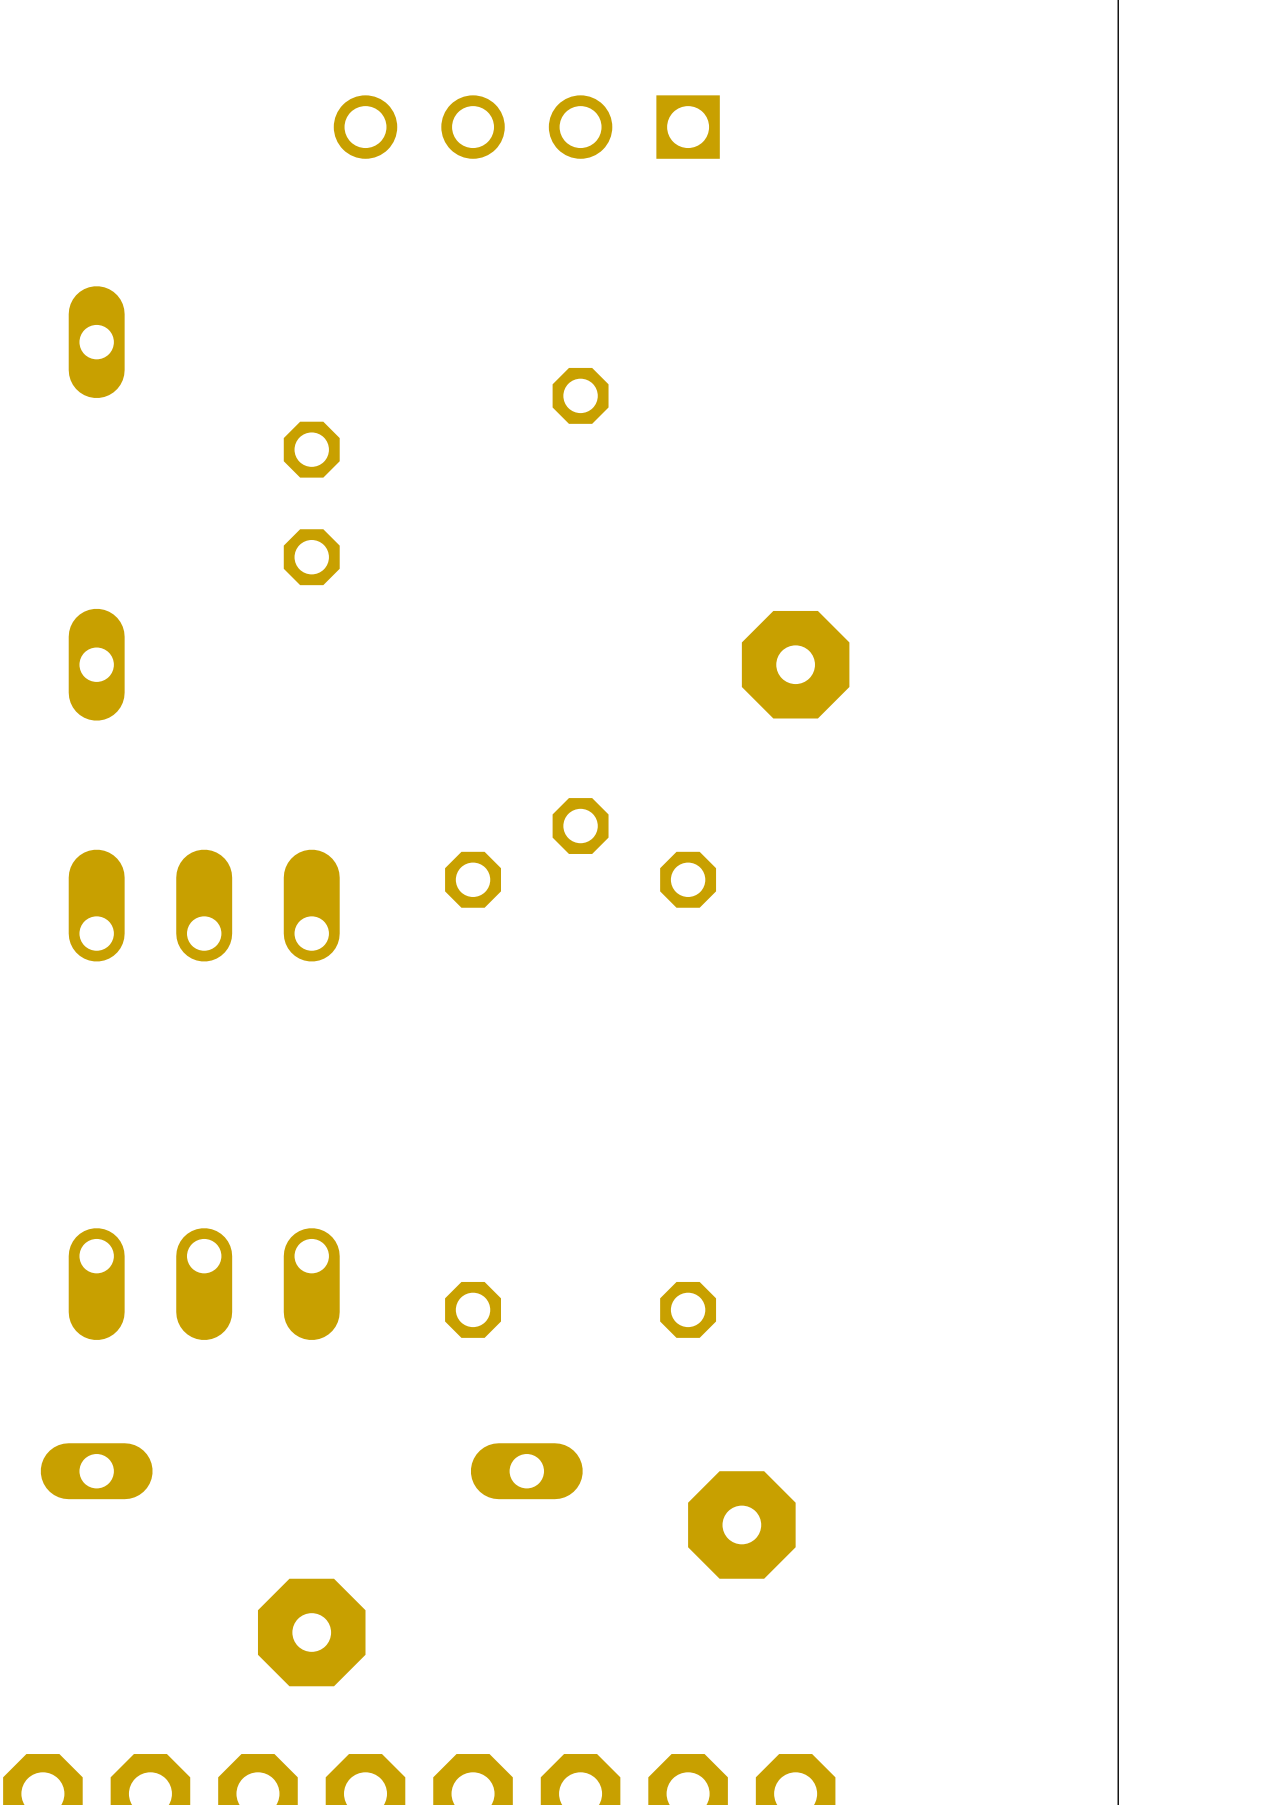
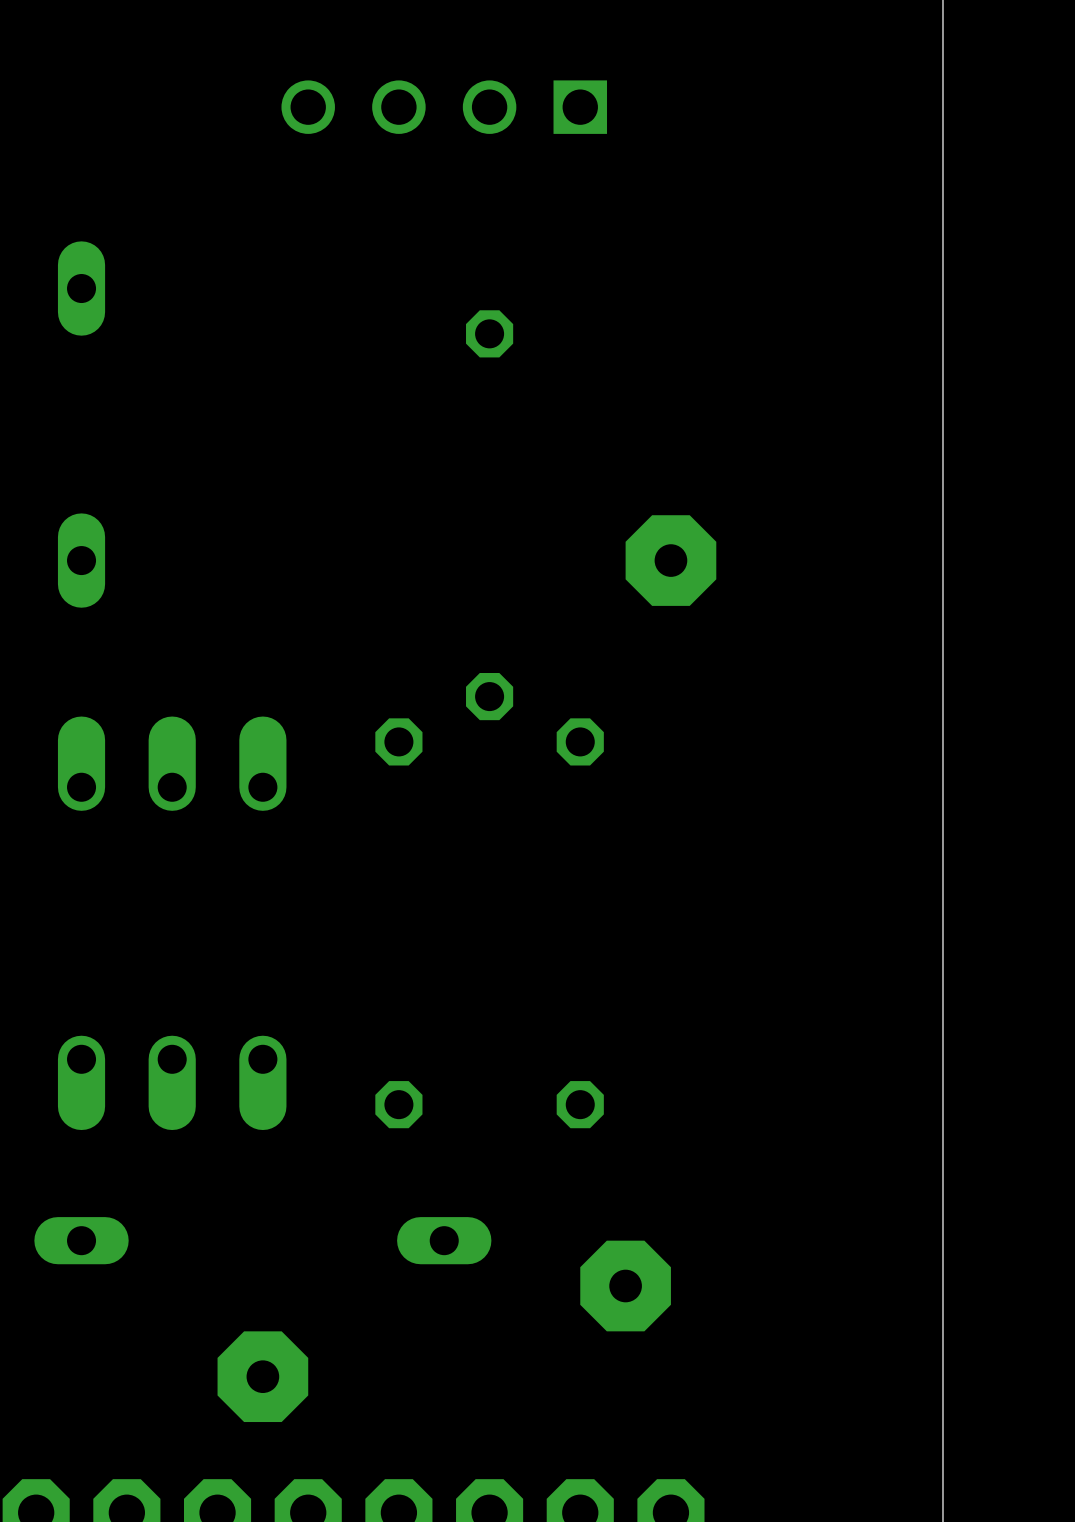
part: (311, 503) -> none

